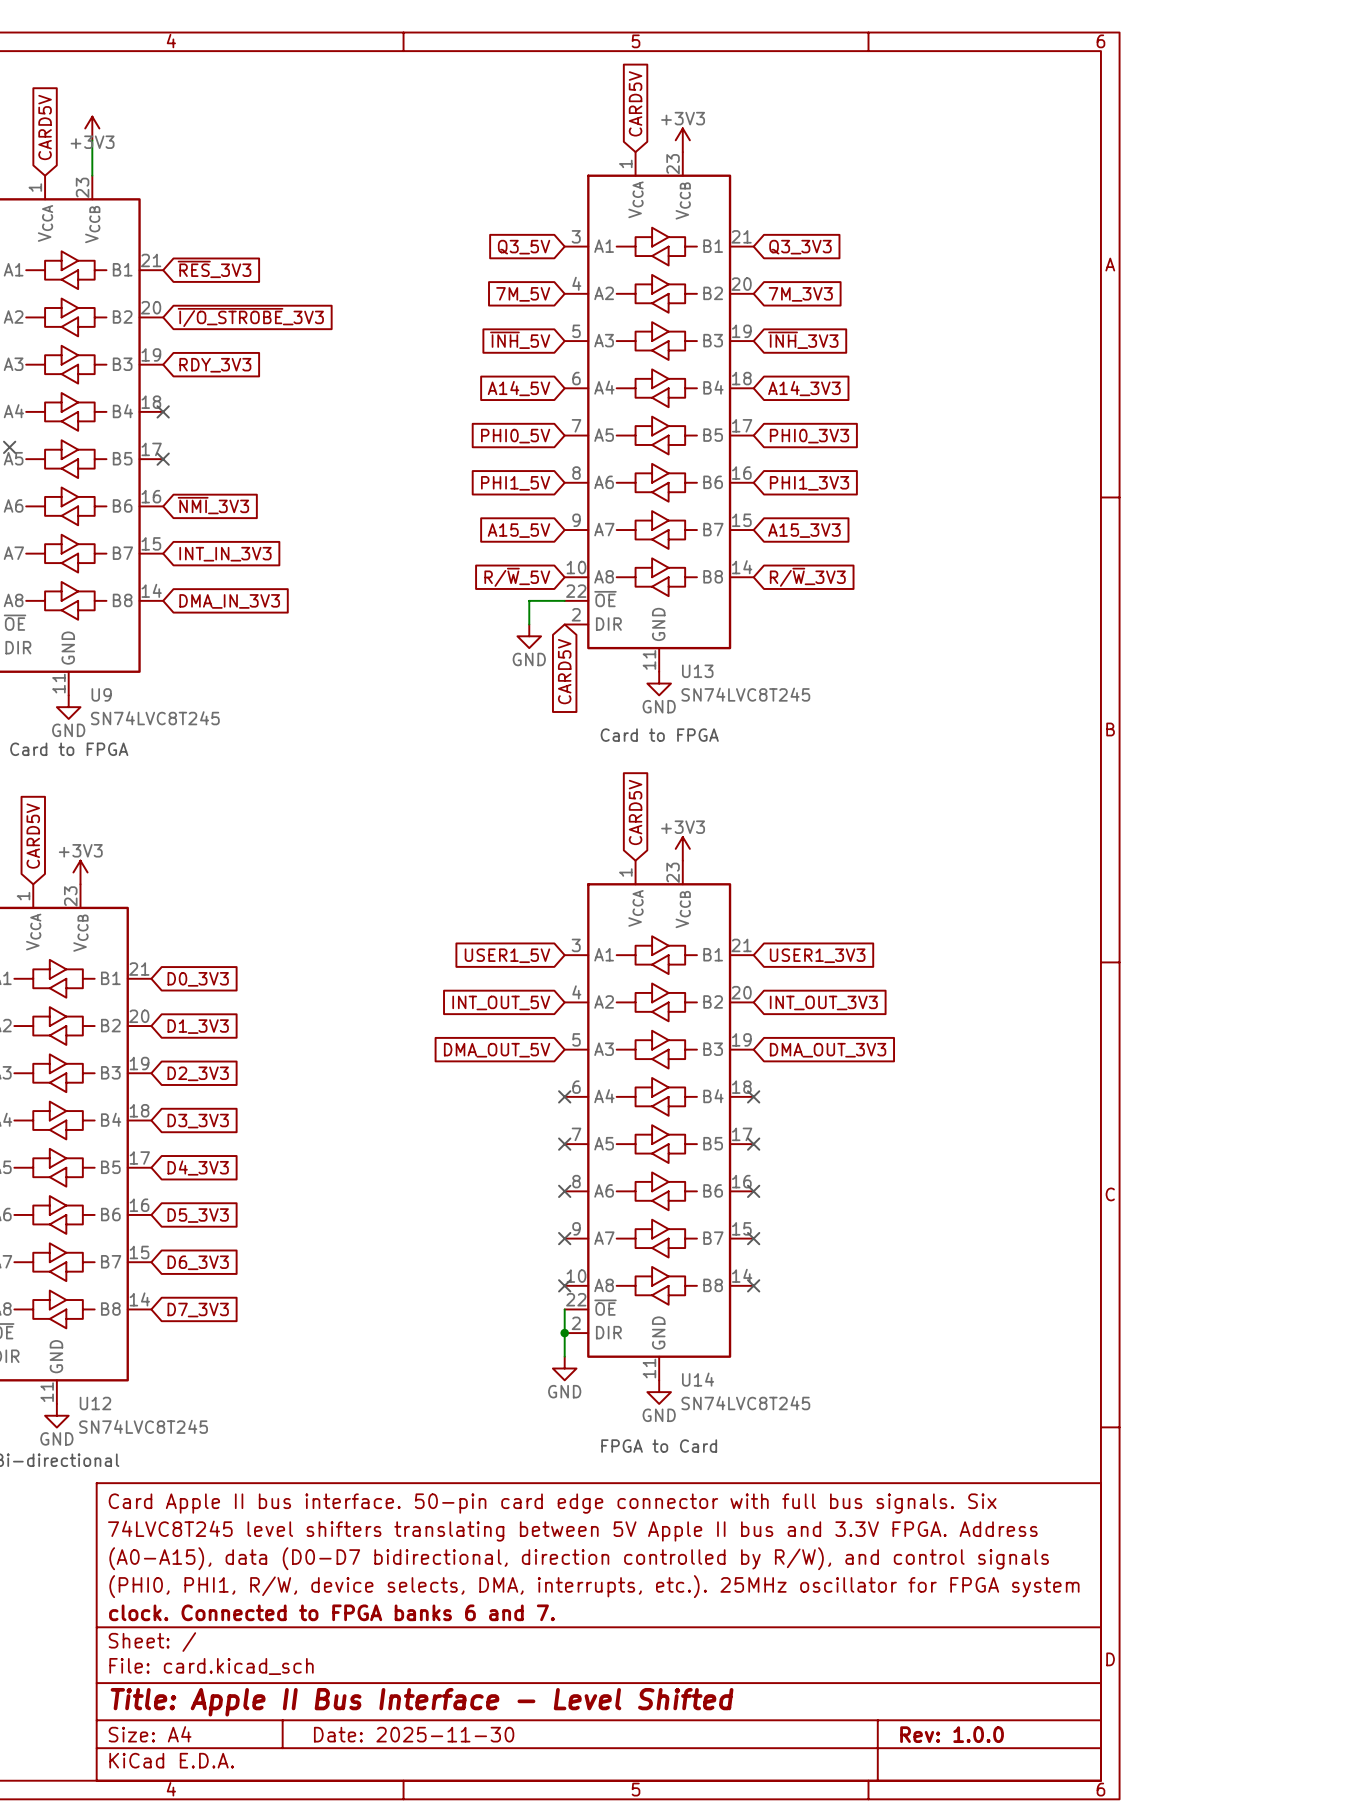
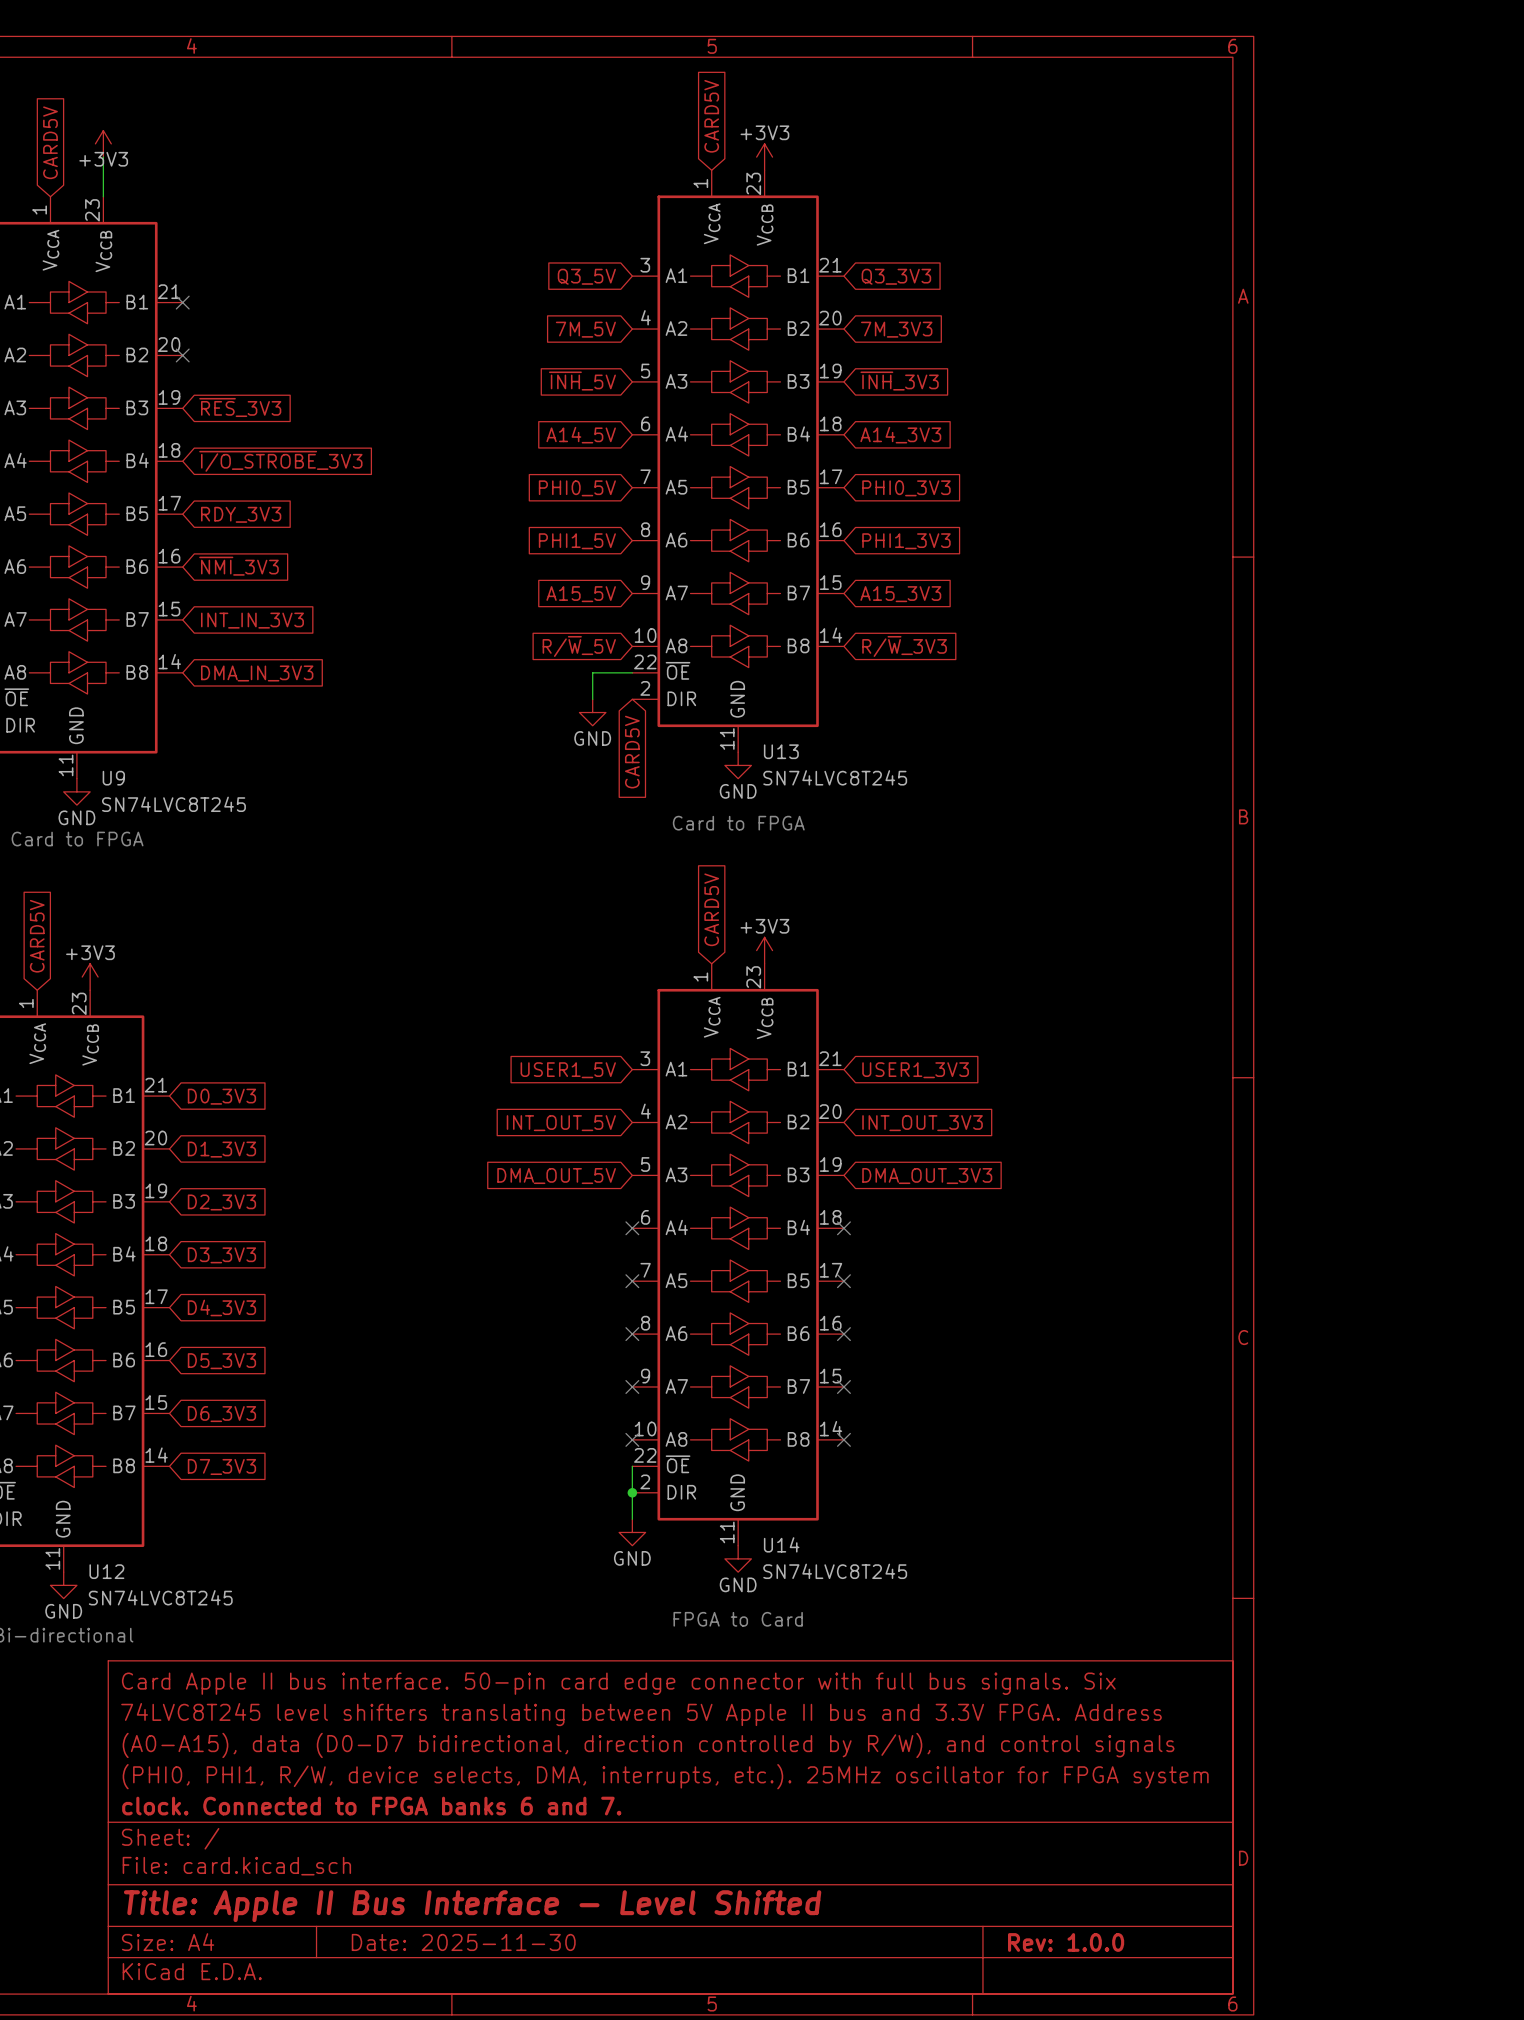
global label: ~{RES}_3V3 (214, 269) -> none
no-connect mark: none -> (182, 302)
no-connect mark: none -> (182, 355)
global label position: ~{I/O_STROBE}_3V3 (250, 317) -> ~{I/O_STROBE}_3V3 (280, 461)
global label: RDY_3V3 (215, 365) -> ~{RES}_3V3 (240, 407)
no-connect mark: (163, 411) -> none
no-connect mark: (9, 447) -> none
no-connect mark: (163, 459) -> none
global label: none -> RDY_3V3 (241, 514)

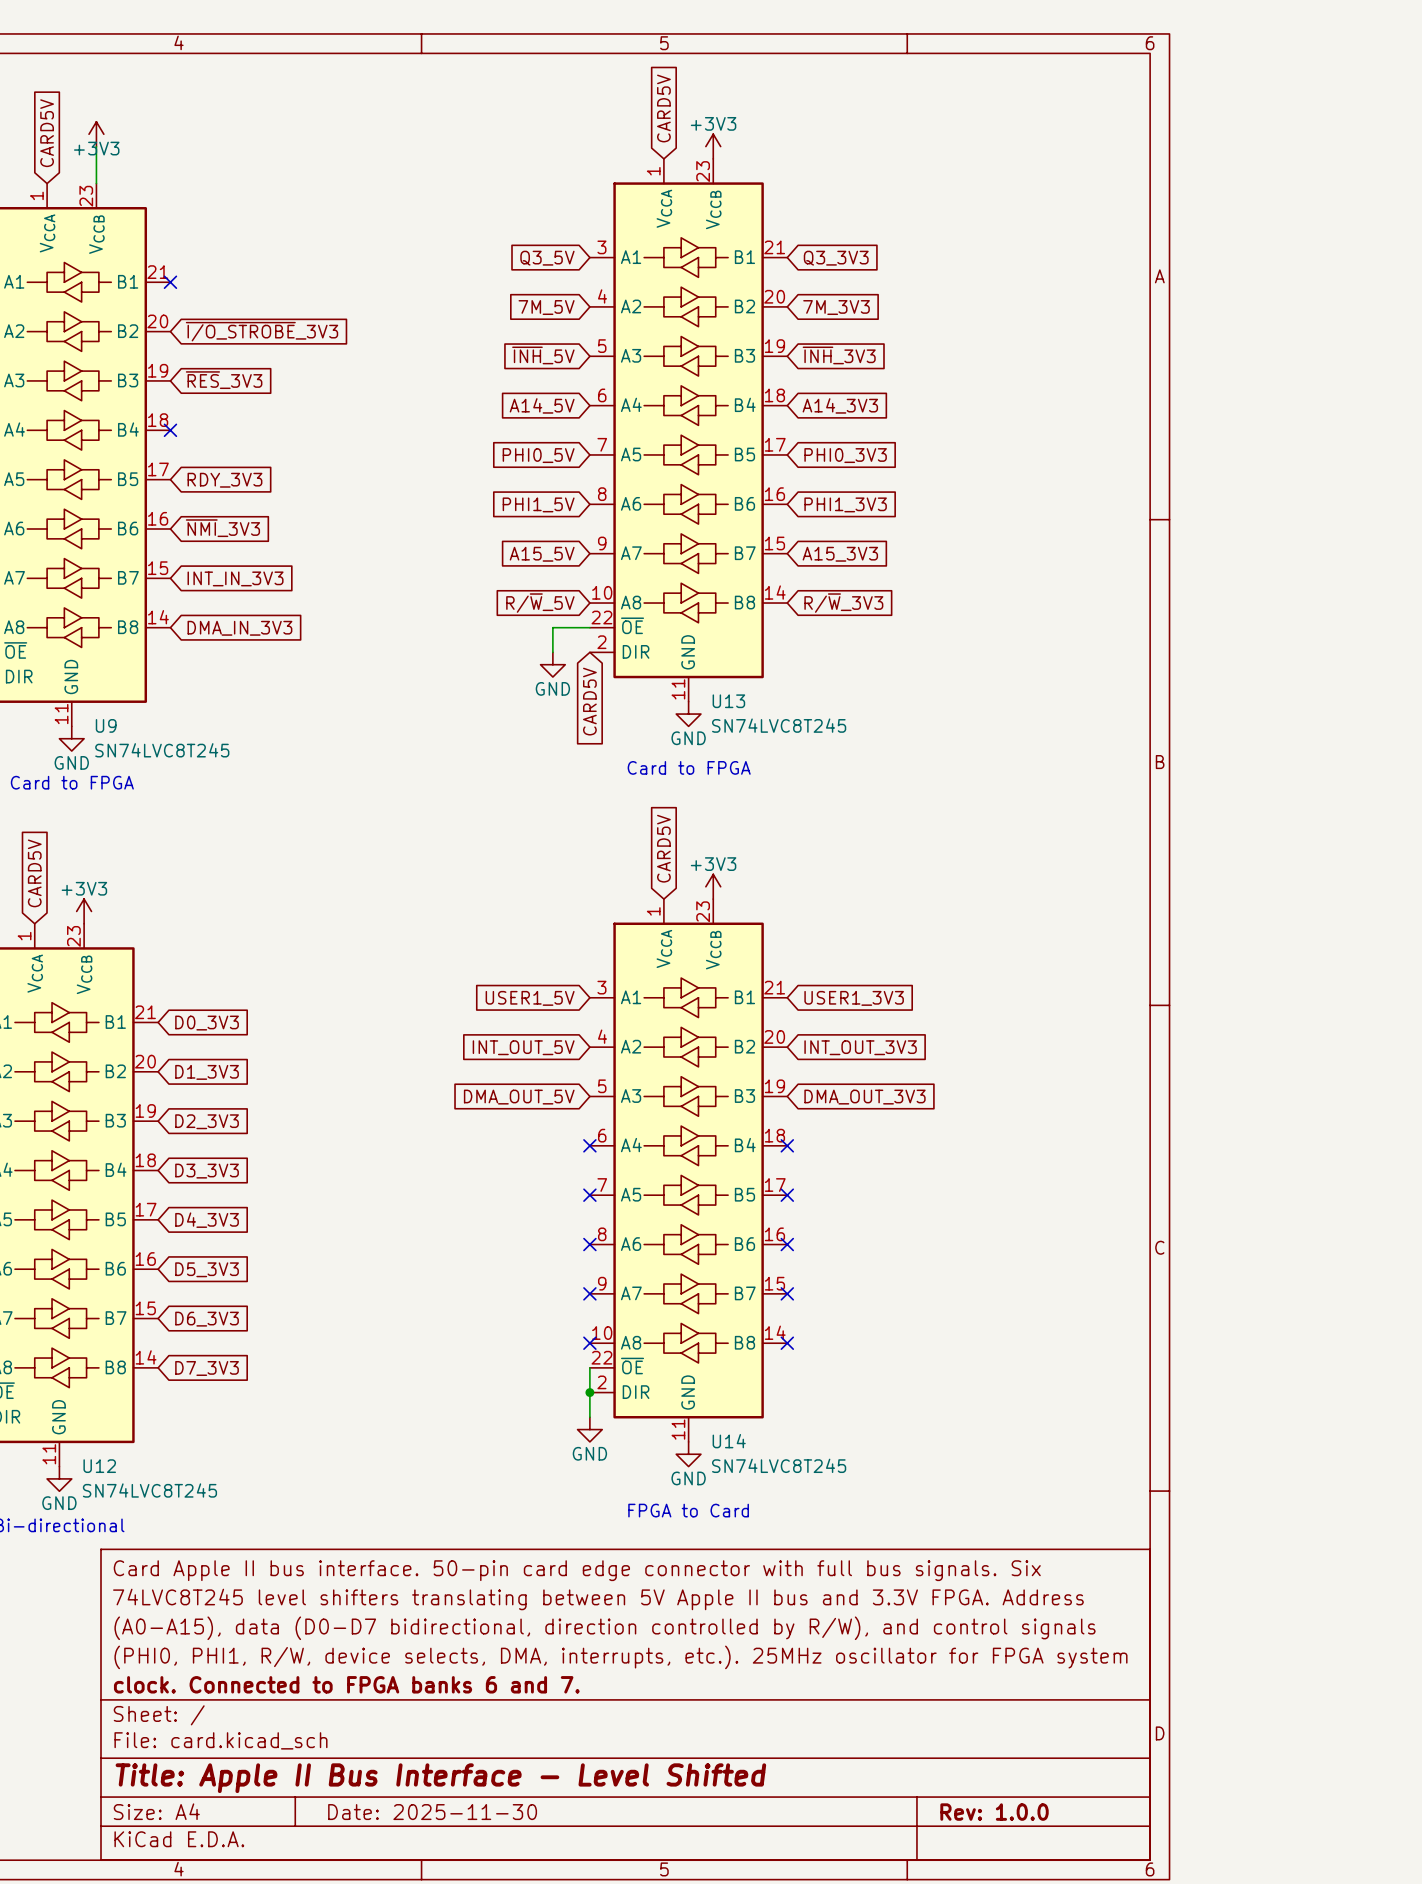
no-connect mark: (182, 355) -> none
no-connect mark: none -> (170, 430)
global label position: ~{I/O_STROBE}_3V3 (280, 461) -> ~{I/O_STROBE}_3V3 (262, 331)

